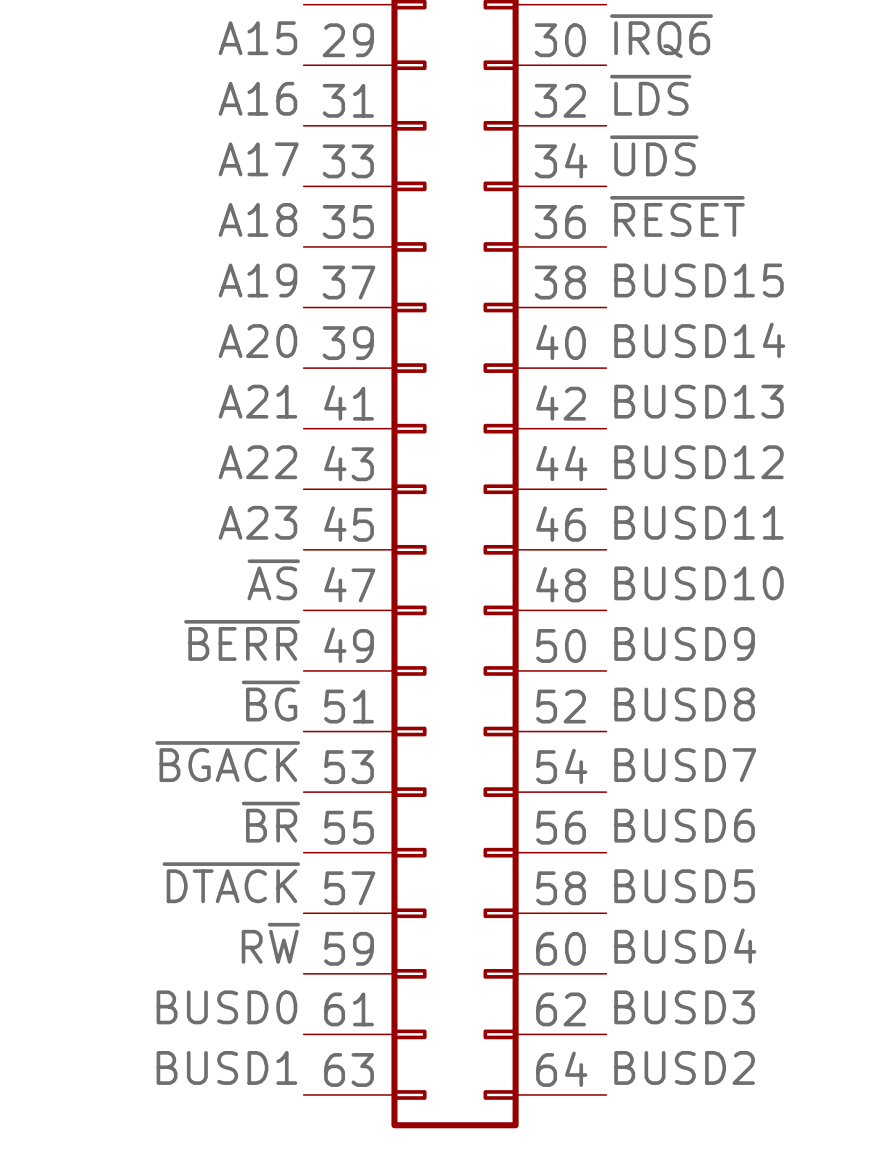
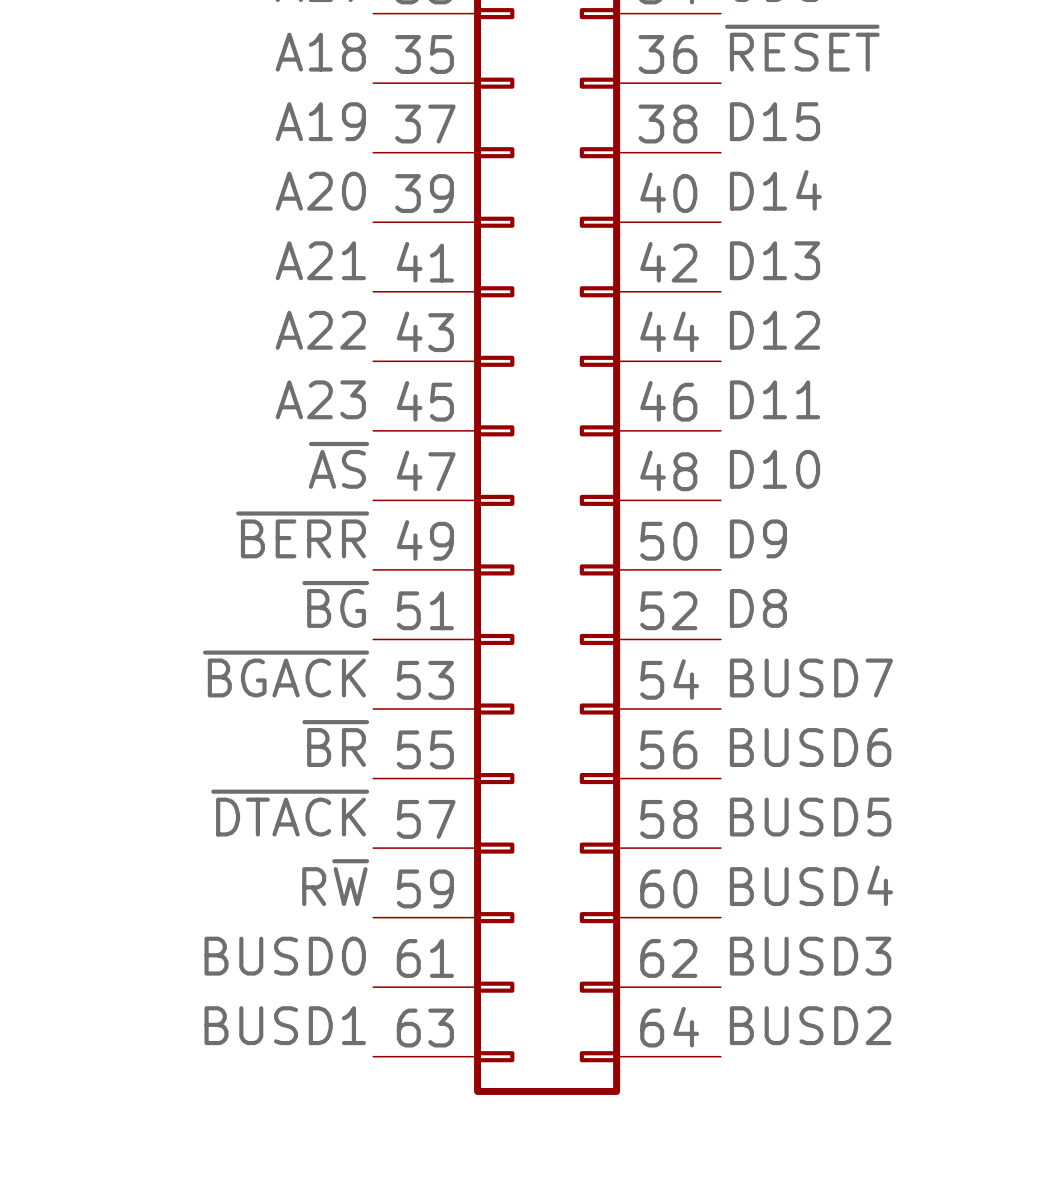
label: BUSD15 (698, 280) -> D15 (774, 121)
label: BUSD14 (699, 340) -> D14 (775, 190)
label: BUSD13 (698, 401) -> D13 (774, 260)
label: BUSD12 (698, 462) -> D12 (774, 330)
label: BUSD11 (698, 522) -> D11 (774, 399)
label: BUSD10 (698, 583) -> D10 (774, 469)
label: BUSD9 (684, 643) -> D9 (758, 538)
label: BUSD8 (684, 704) -> D8 (758, 608)

